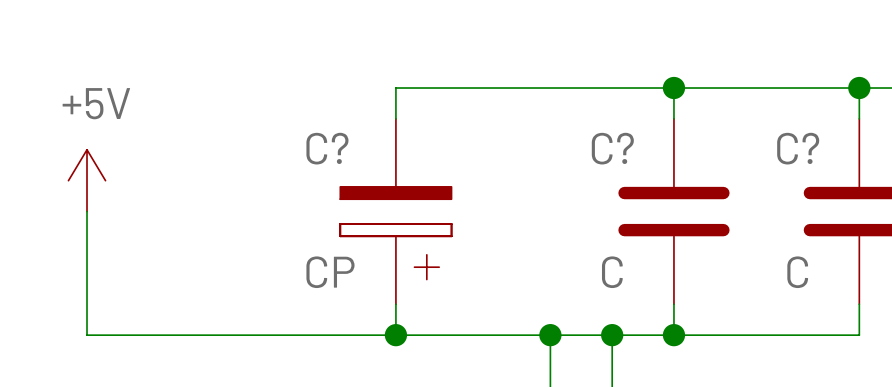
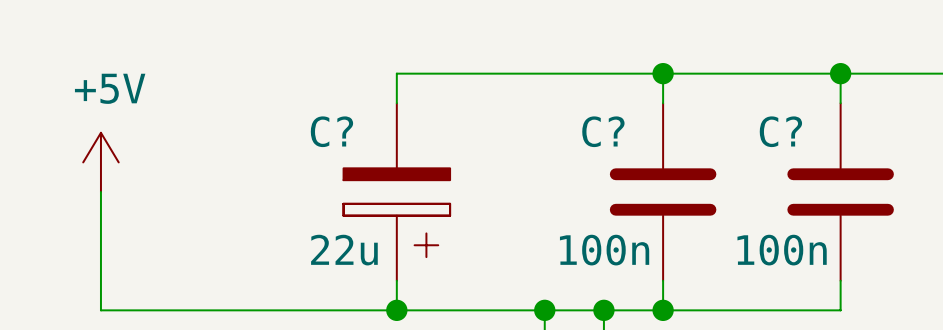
C? value: CP (330, 272) -> 22u (344, 250)
C? value: C (612, 272) -> 100n (604, 250)
C? value: C (797, 272) -> 100n (782, 250)

